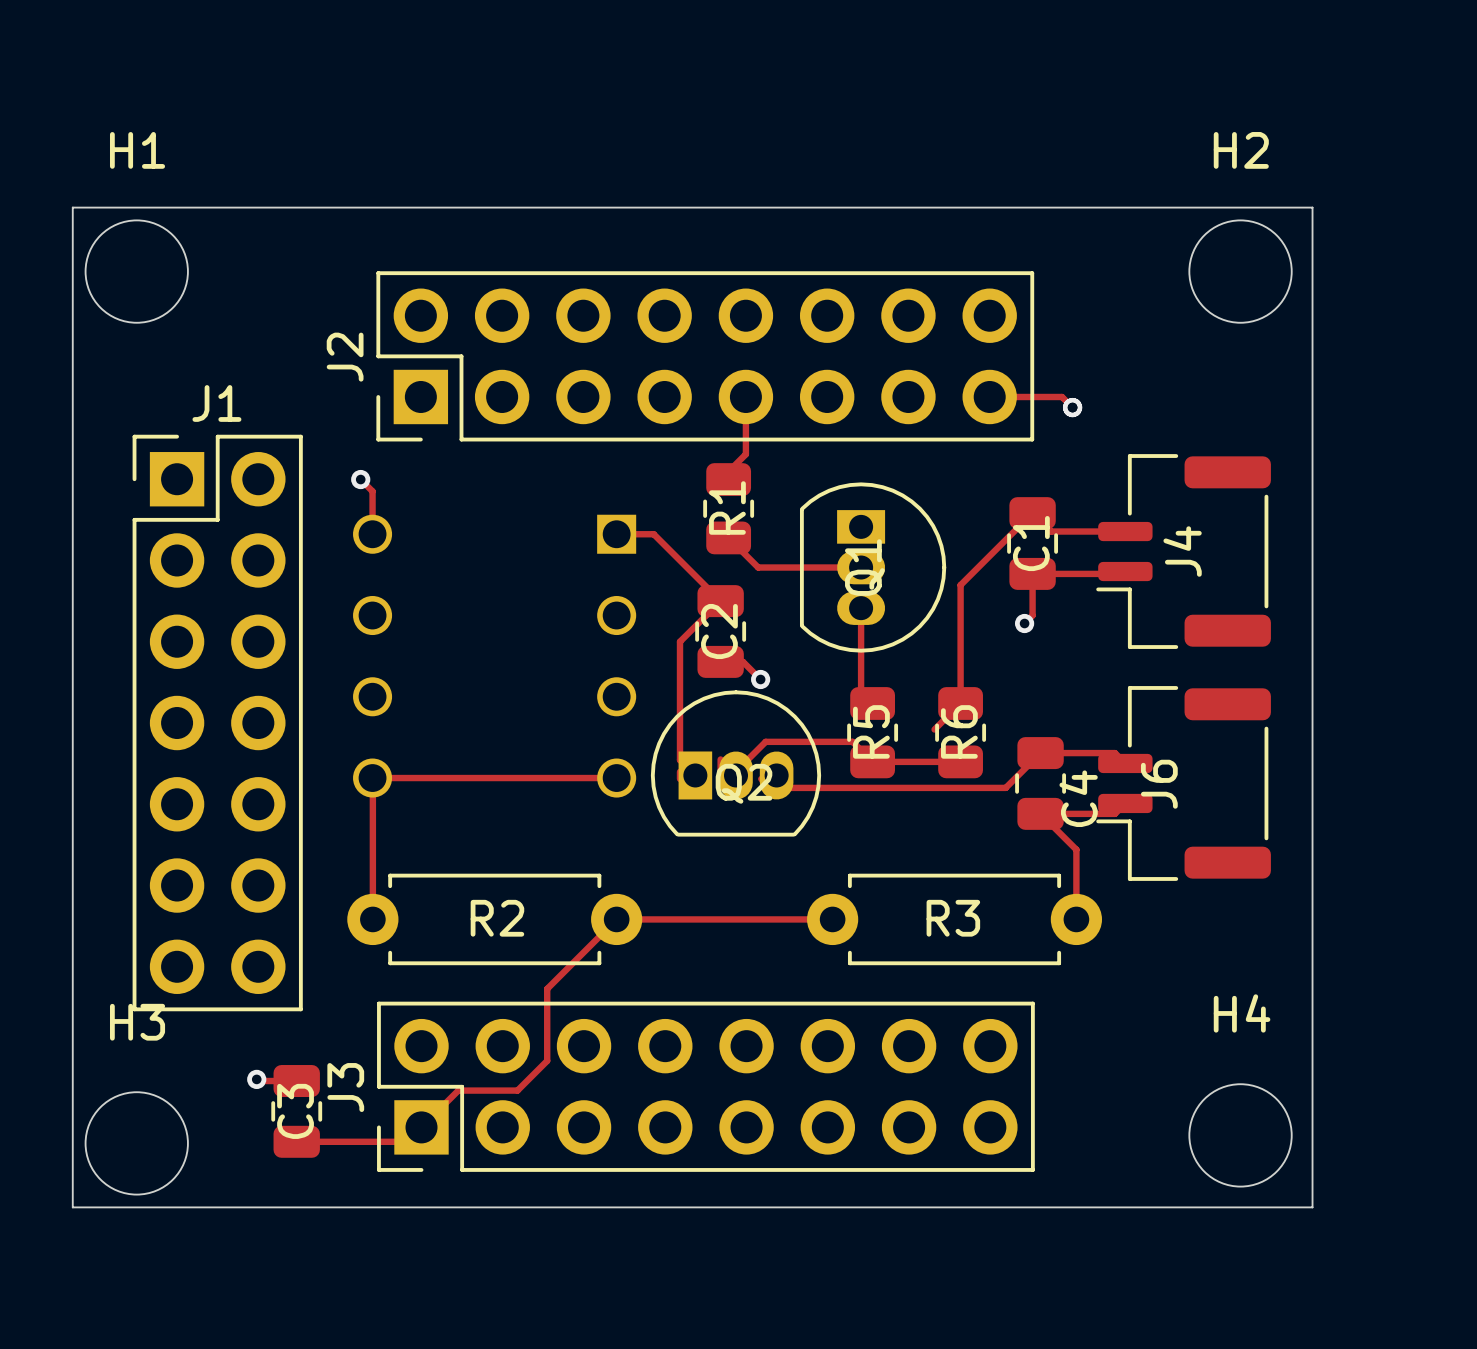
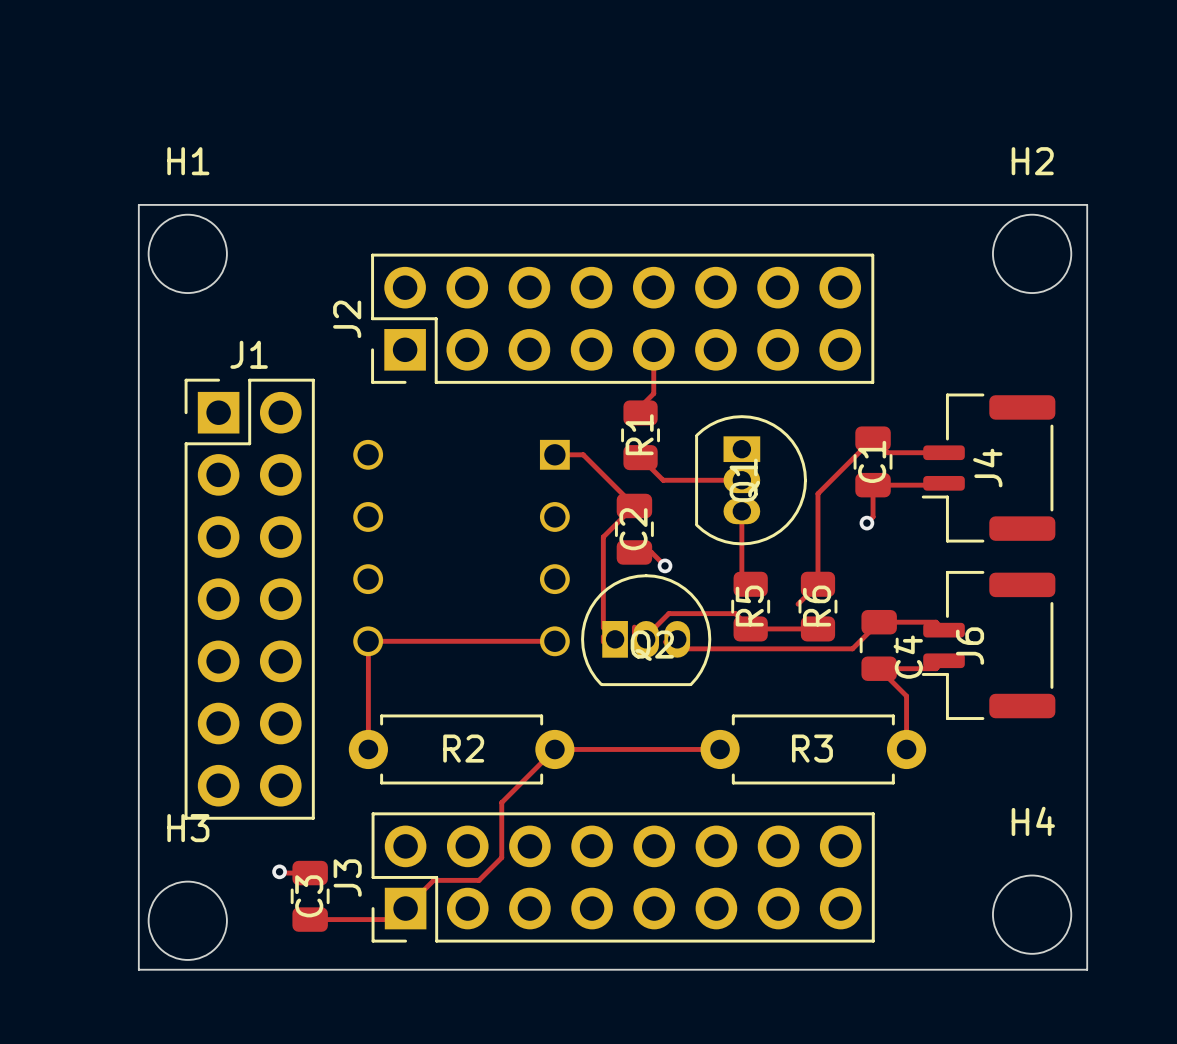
top track: (989, 396) (1062, 396) (1072, 407) -> none
via: (1072, 407) -> none
top track: (360, 479) (372, 491) (372, 534) -> none
via: (360, 479) -> none

